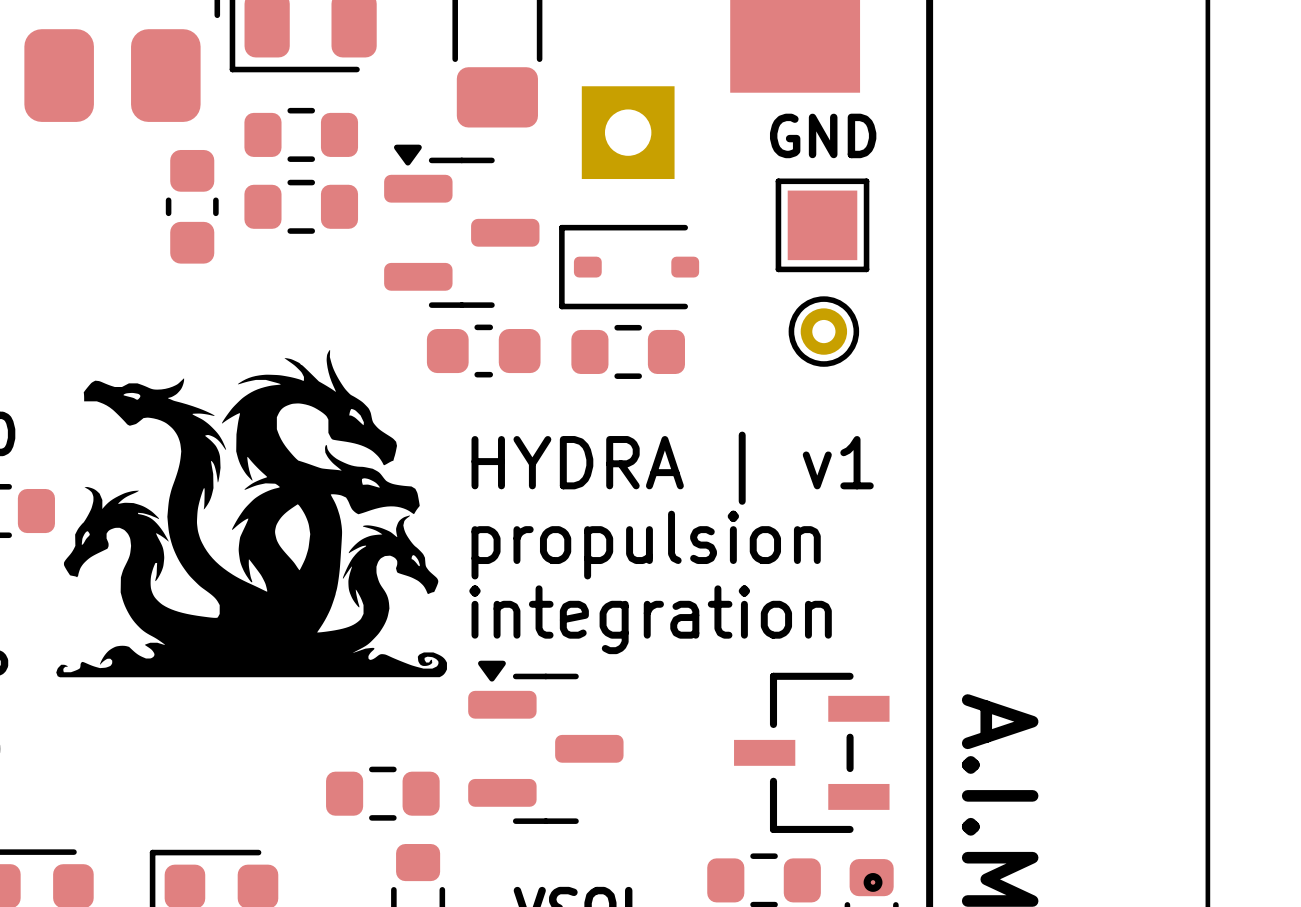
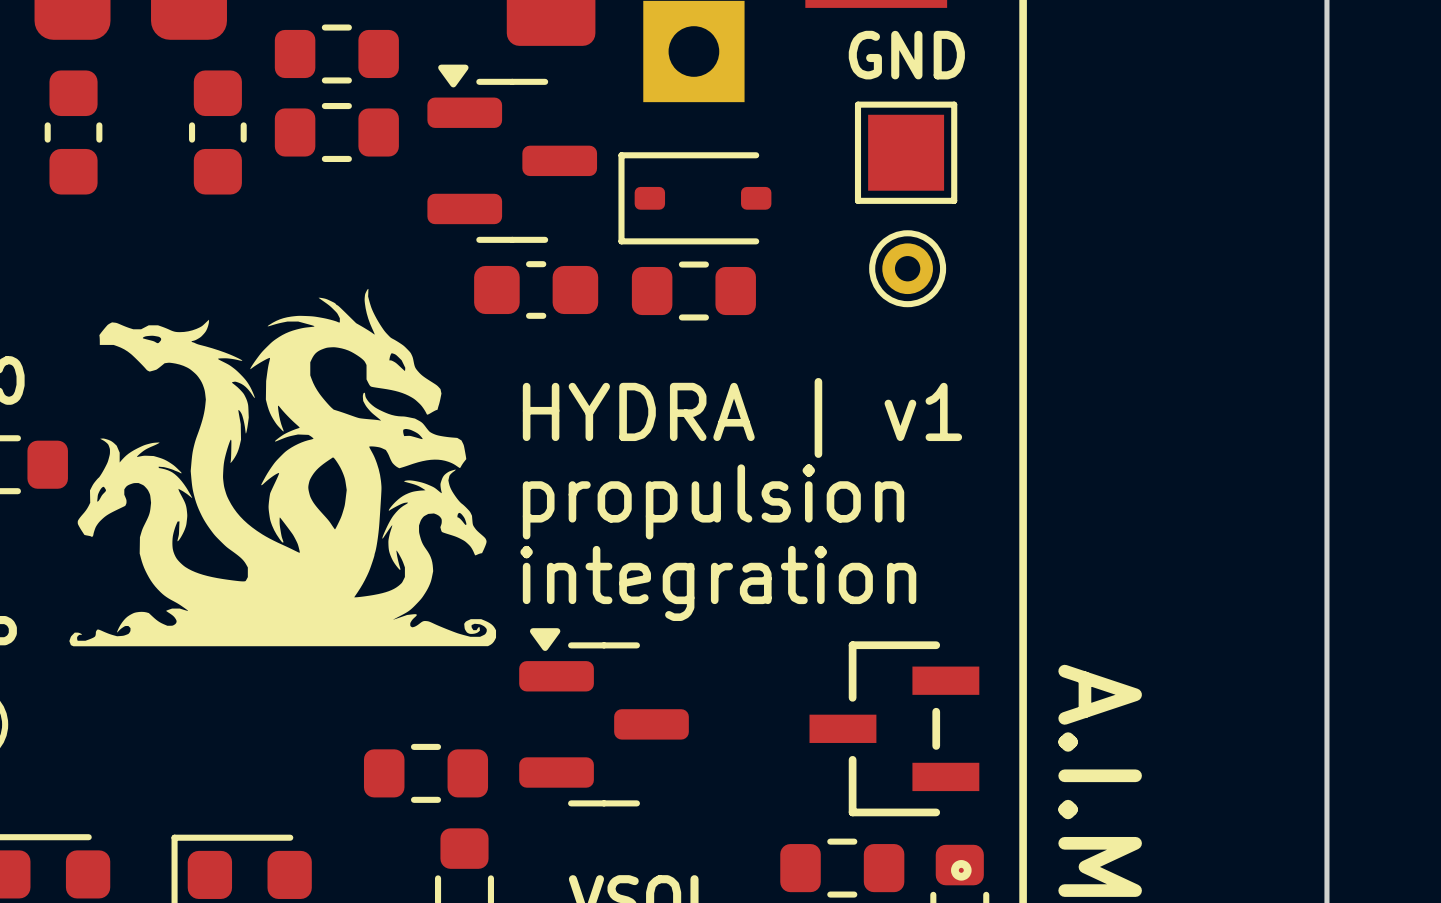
part: none -> (73, 132)

